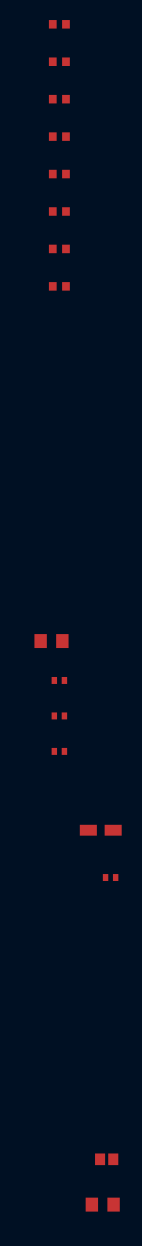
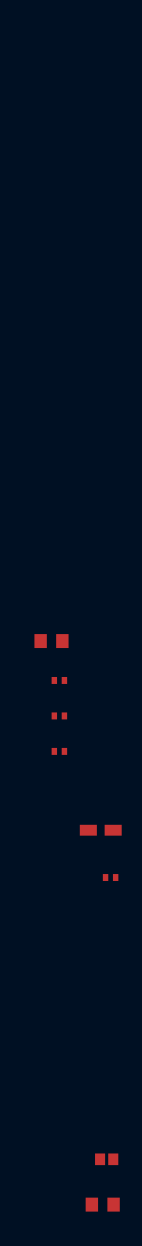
part: (59, 24) -> none
part: (59, 61) -> none
part: (59, 99) -> none
part: (59, 136) -> none
part: (59, 174) -> none
part: (59, 211) -> none
part: (59, 248) -> none
part: (59, 286) -> none

